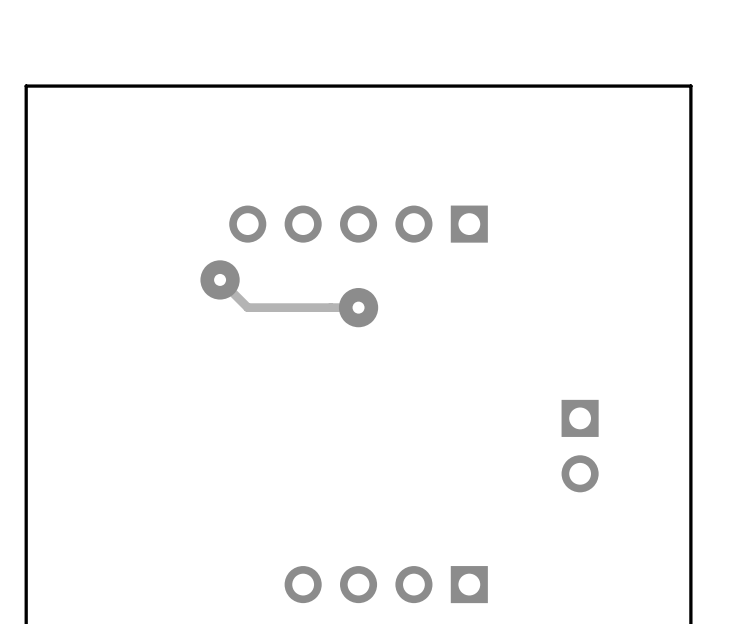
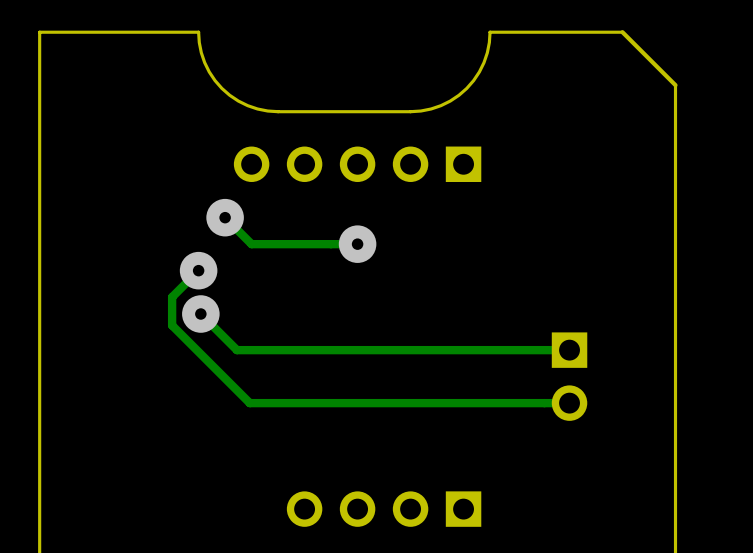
board edge: (497, 86) (192, 86) -> (490, 32) (484, 62) (466, 88) (440, 105) (410, 111) (278, 111) (247, 105) (221, 88) (209, 71) (201, 52) (198, 32)
board edge: (635, 86) (690, 86) (690, 141) -> (622, 32) (675, 85)
track: none -> (198, 270) (172, 297) (172, 325) (249, 403) (569, 403)
via: none -> (198, 270)
track: none -> (200, 314) (236, 350) (569, 350)
via: none -> (200, 314)

